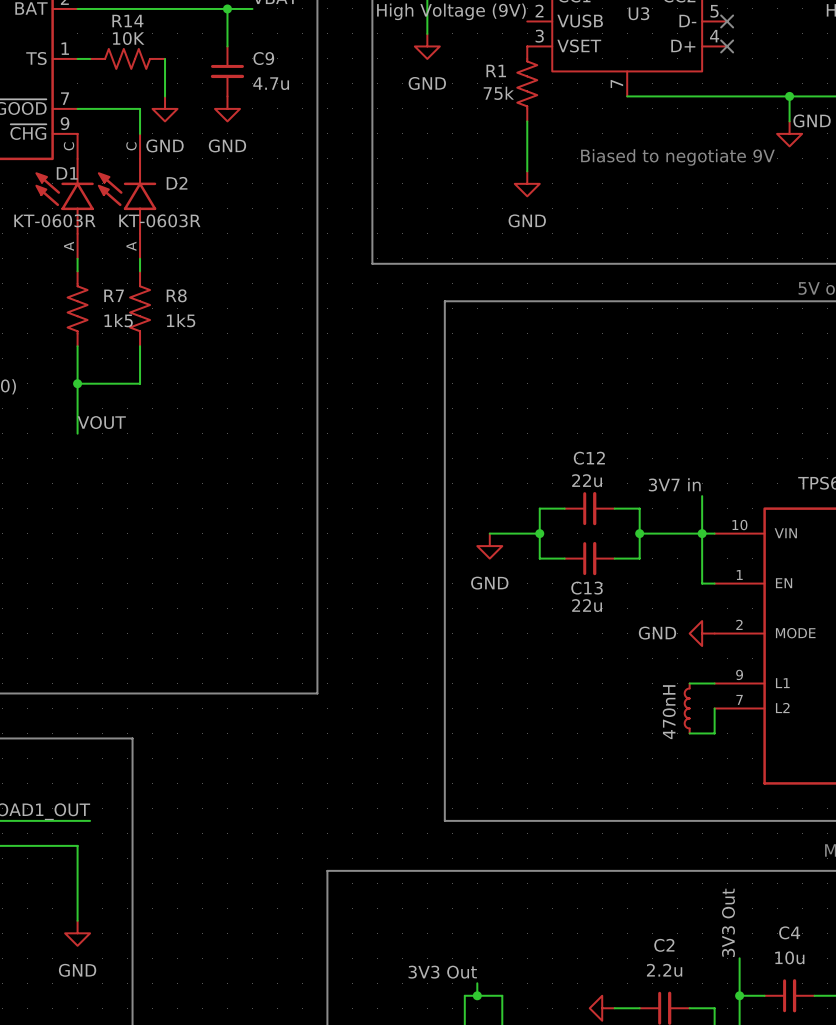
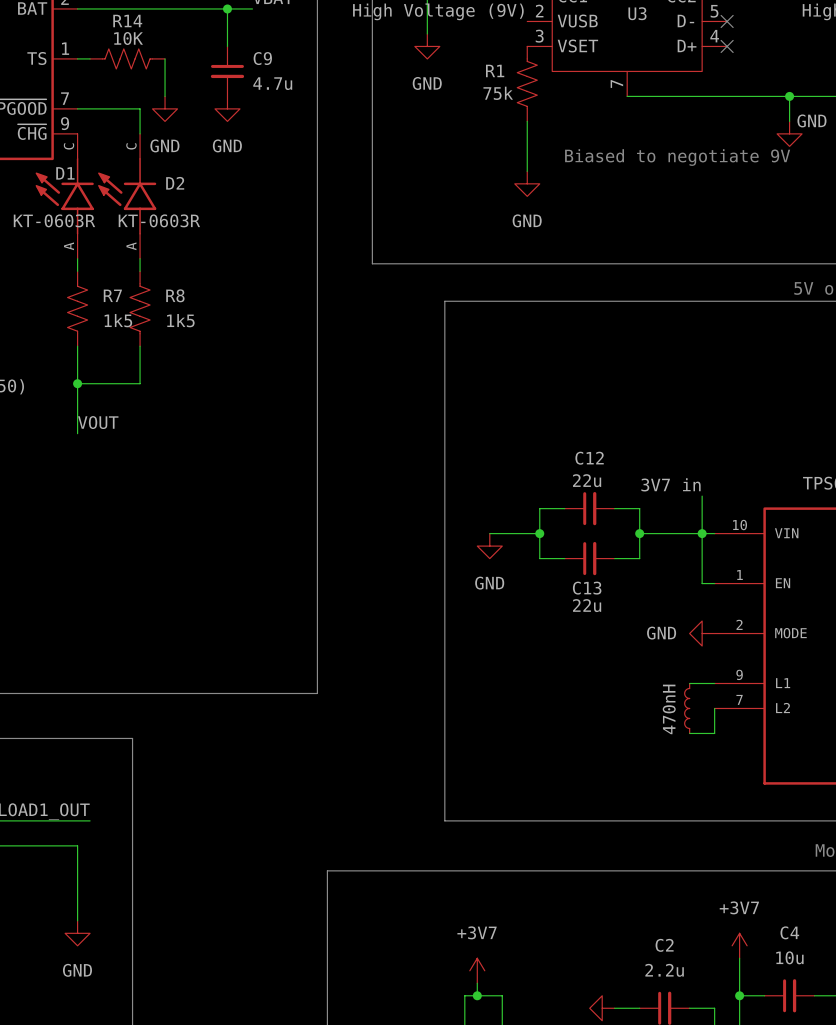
label: 3V3 Out (728, 922) -> none
power symbol: none -> +3V7 (739, 945)
power symbol: none -> +3V7 (477, 970)
label: 3V3 Out (442, 972) -> none

